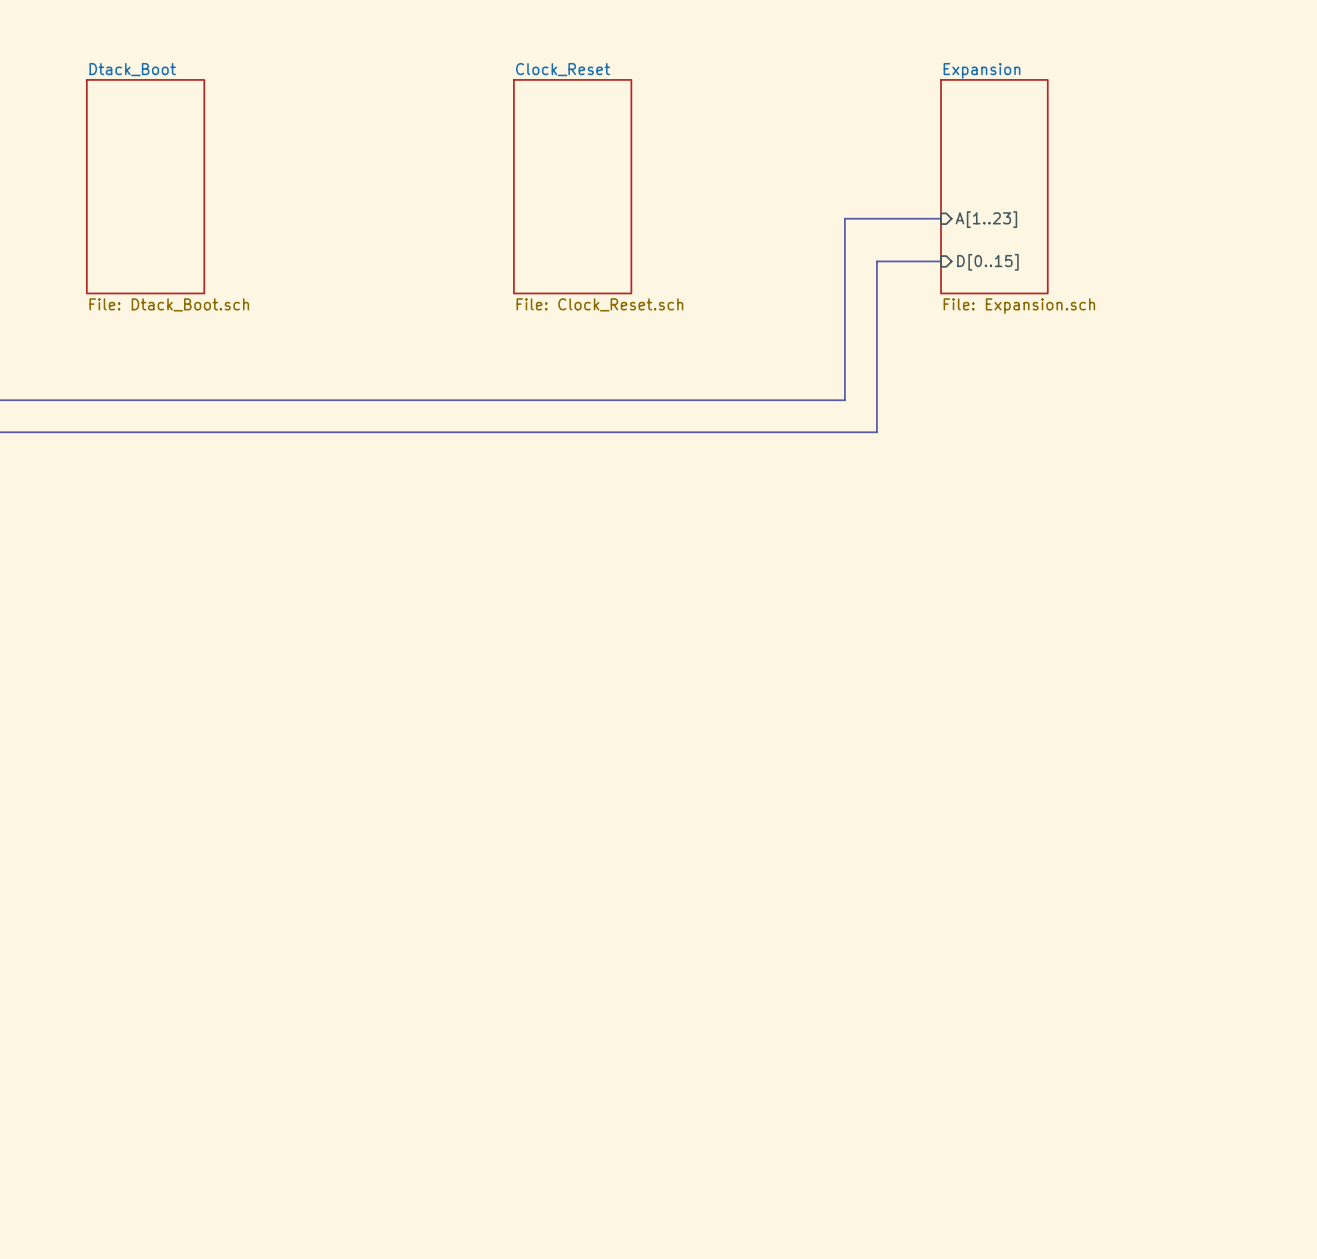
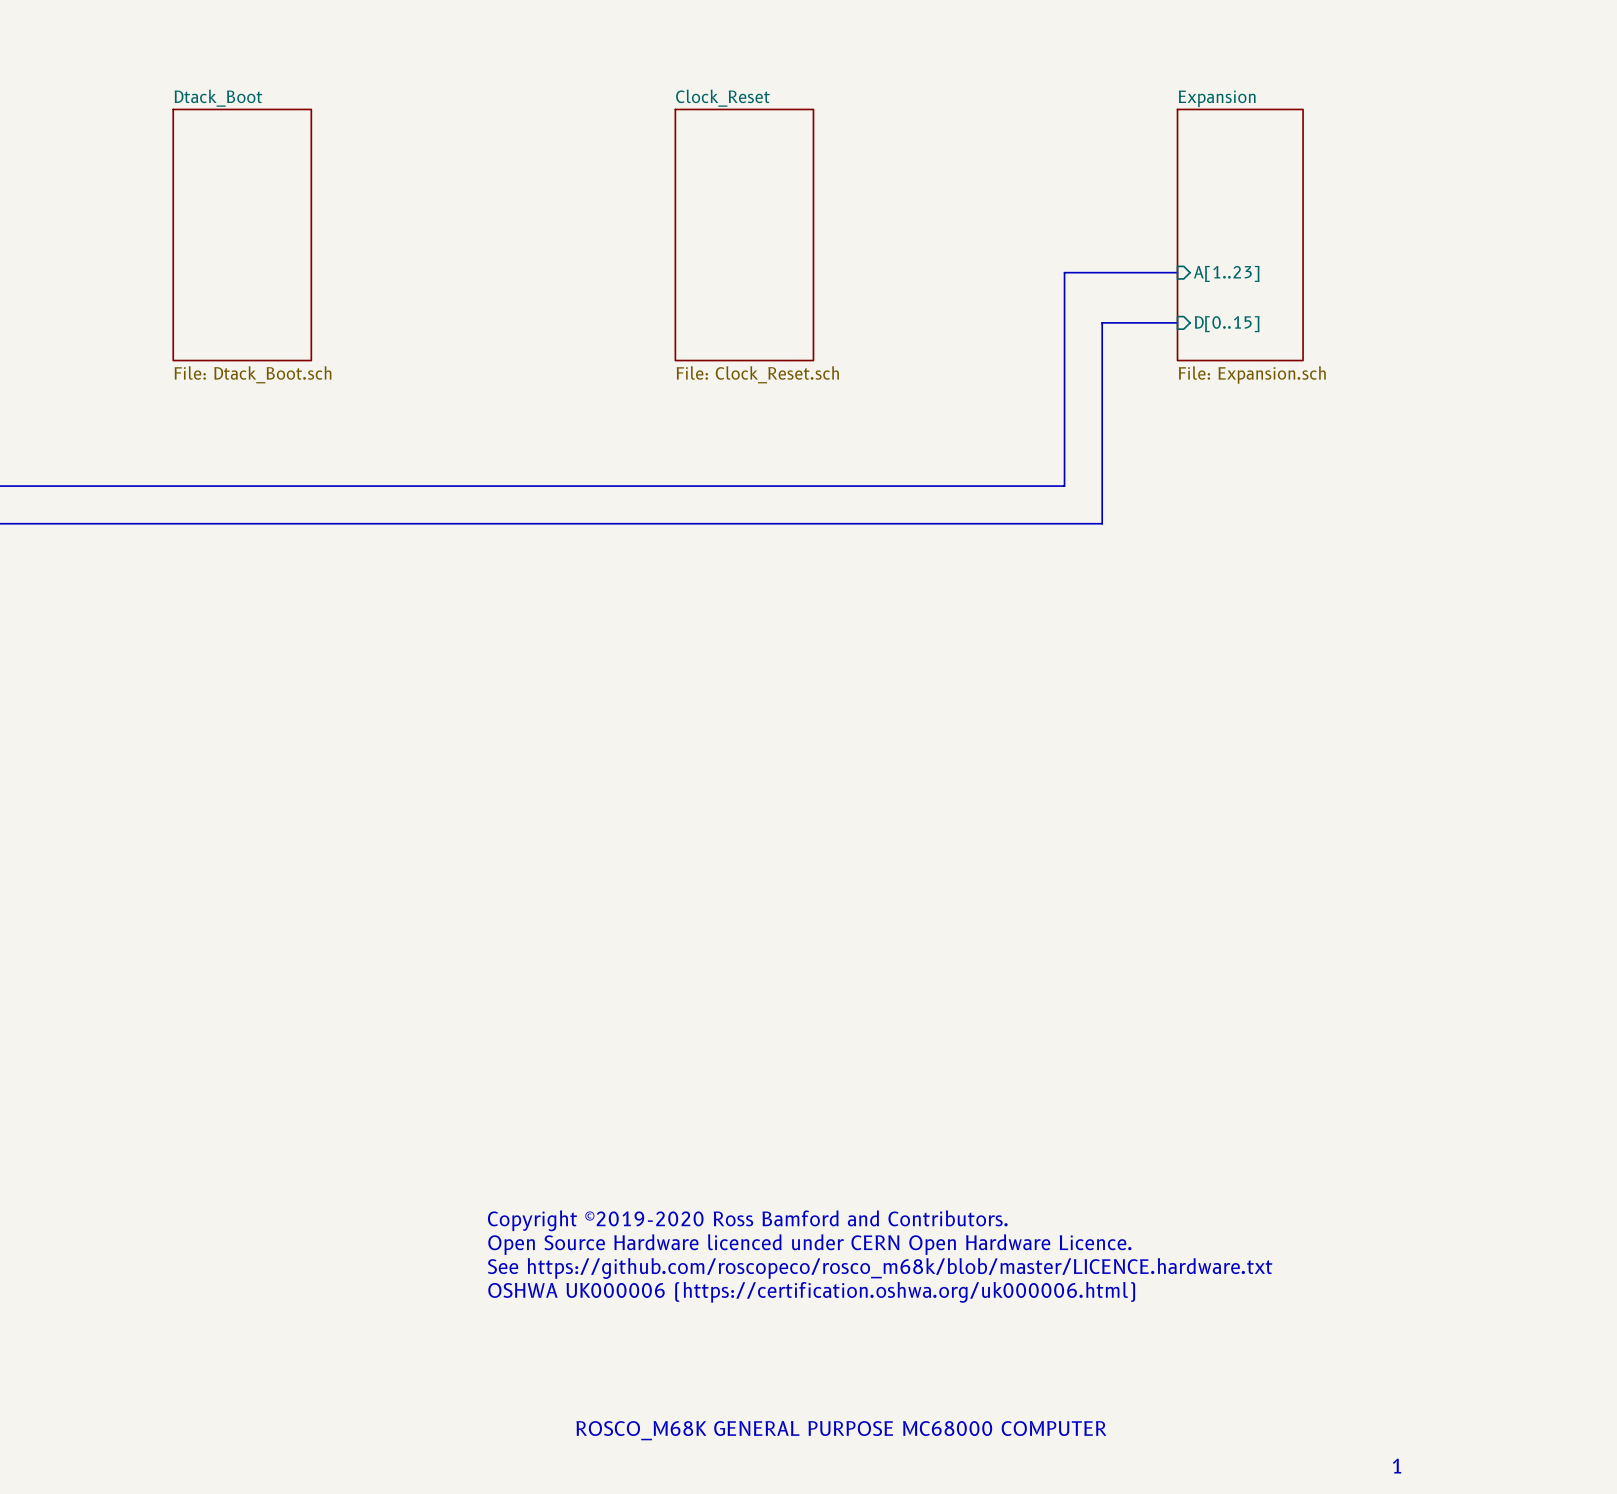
text: none -> Copyright ©2019-2020 Ross Bamford and Contributors. (747, 1220)
text: none -> Open Source Hardware licenced under CERN Open Hardware Licence. (809, 1244)
text: none -> See https://github.com/roscopeco/rosco_m68k/blob/master/LICENCE.hardware.txt (880, 1268)
text: none -> OSHWA UK000006 (https://certification.oshwa.org/uk000006.html) (811, 1292)
text: none -> ROSCO_M68K GENERAL PURPOSE MC68000 COMPUTER (841, 1430)
text: none -> 1 (1397, 1466)

